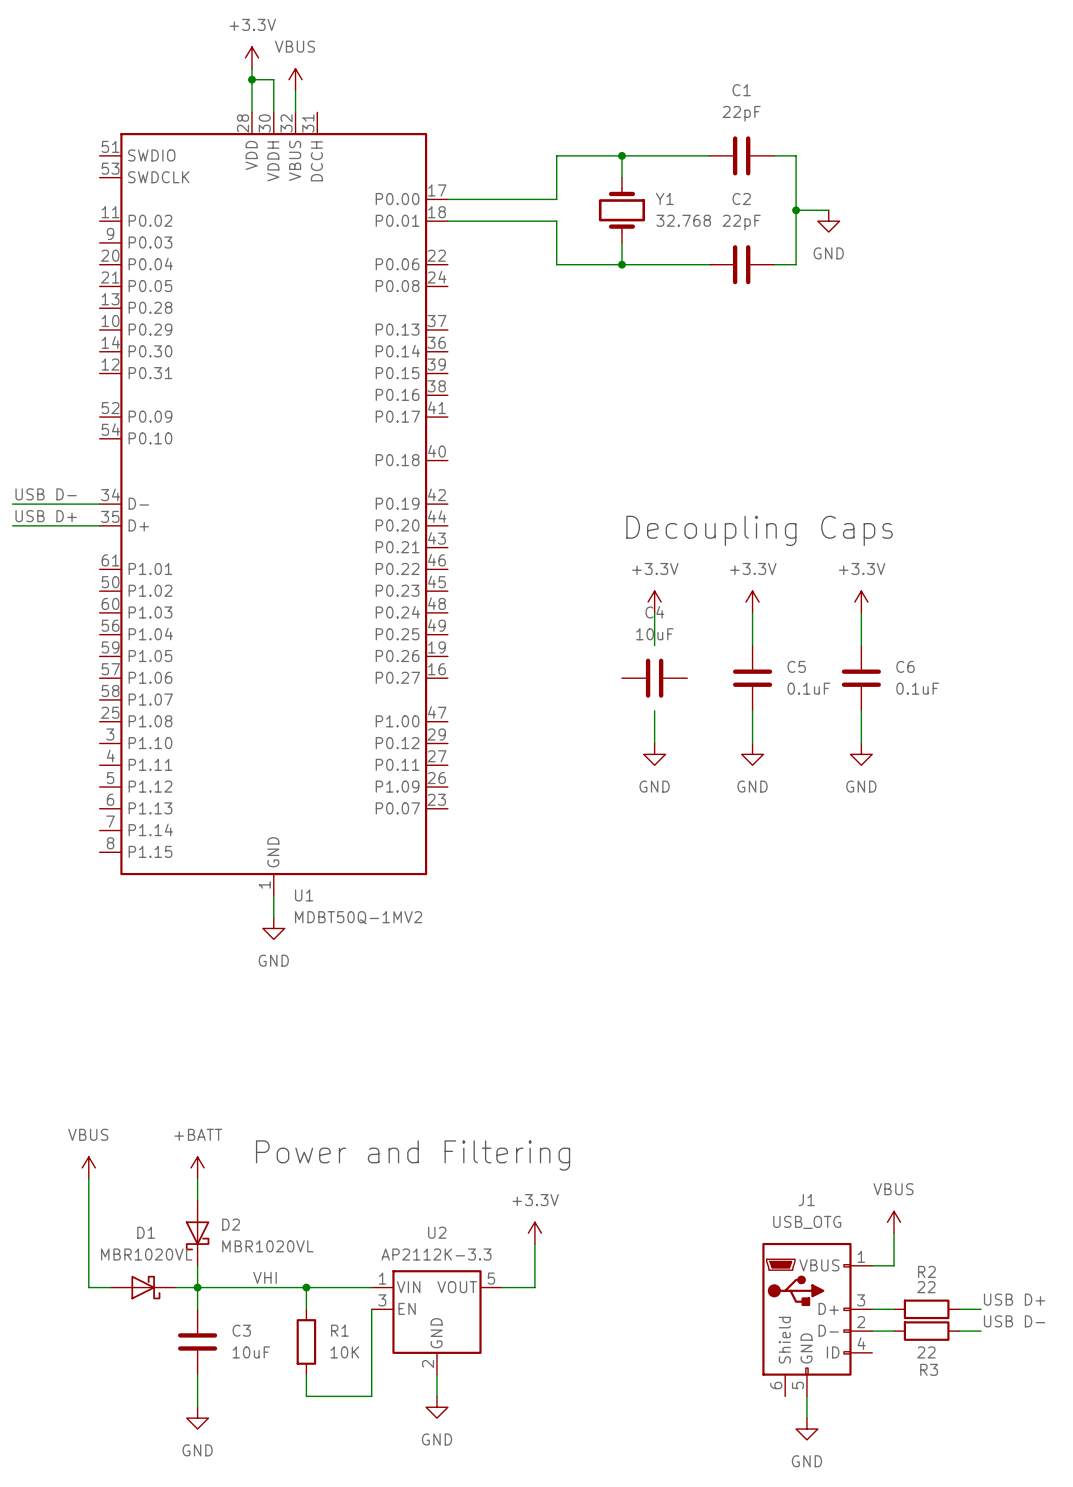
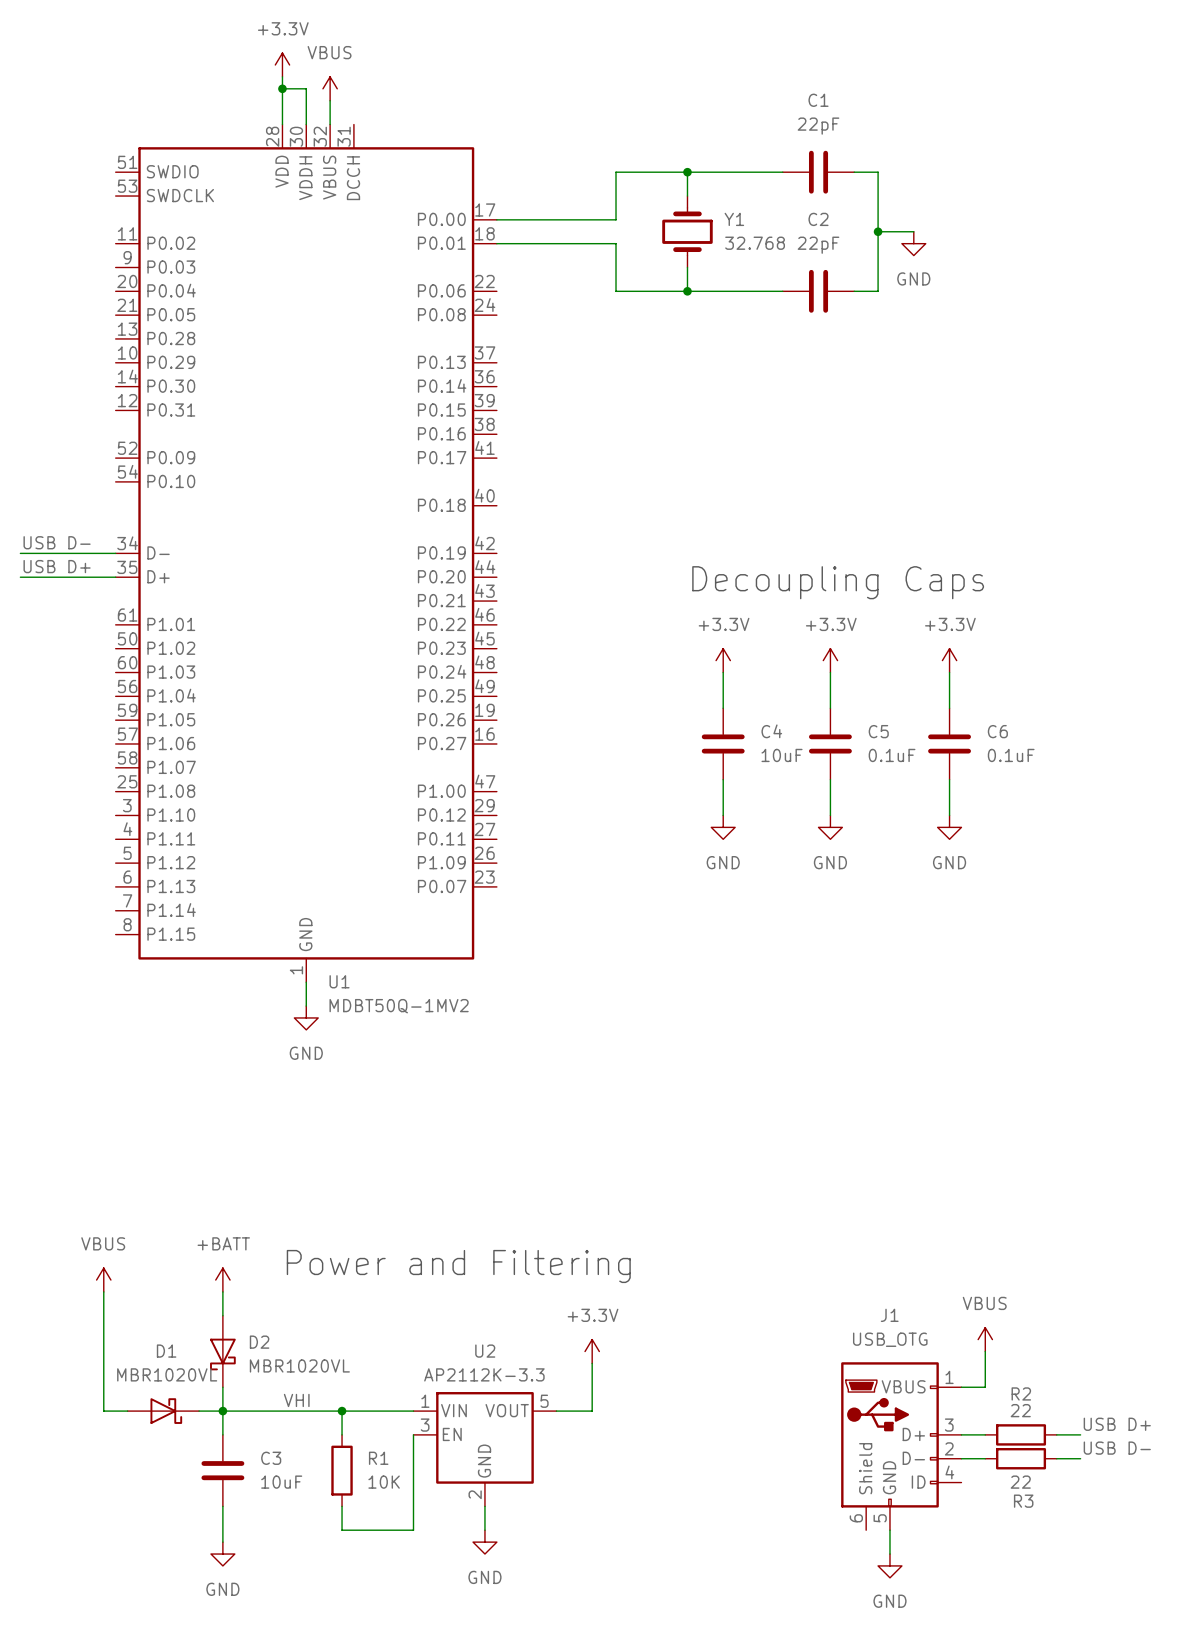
C4 name position: C4 (654, 612) -> C4 (771, 731)
C4 rotation: 0° (654, 678) -> 90° clockwise (723, 743)

